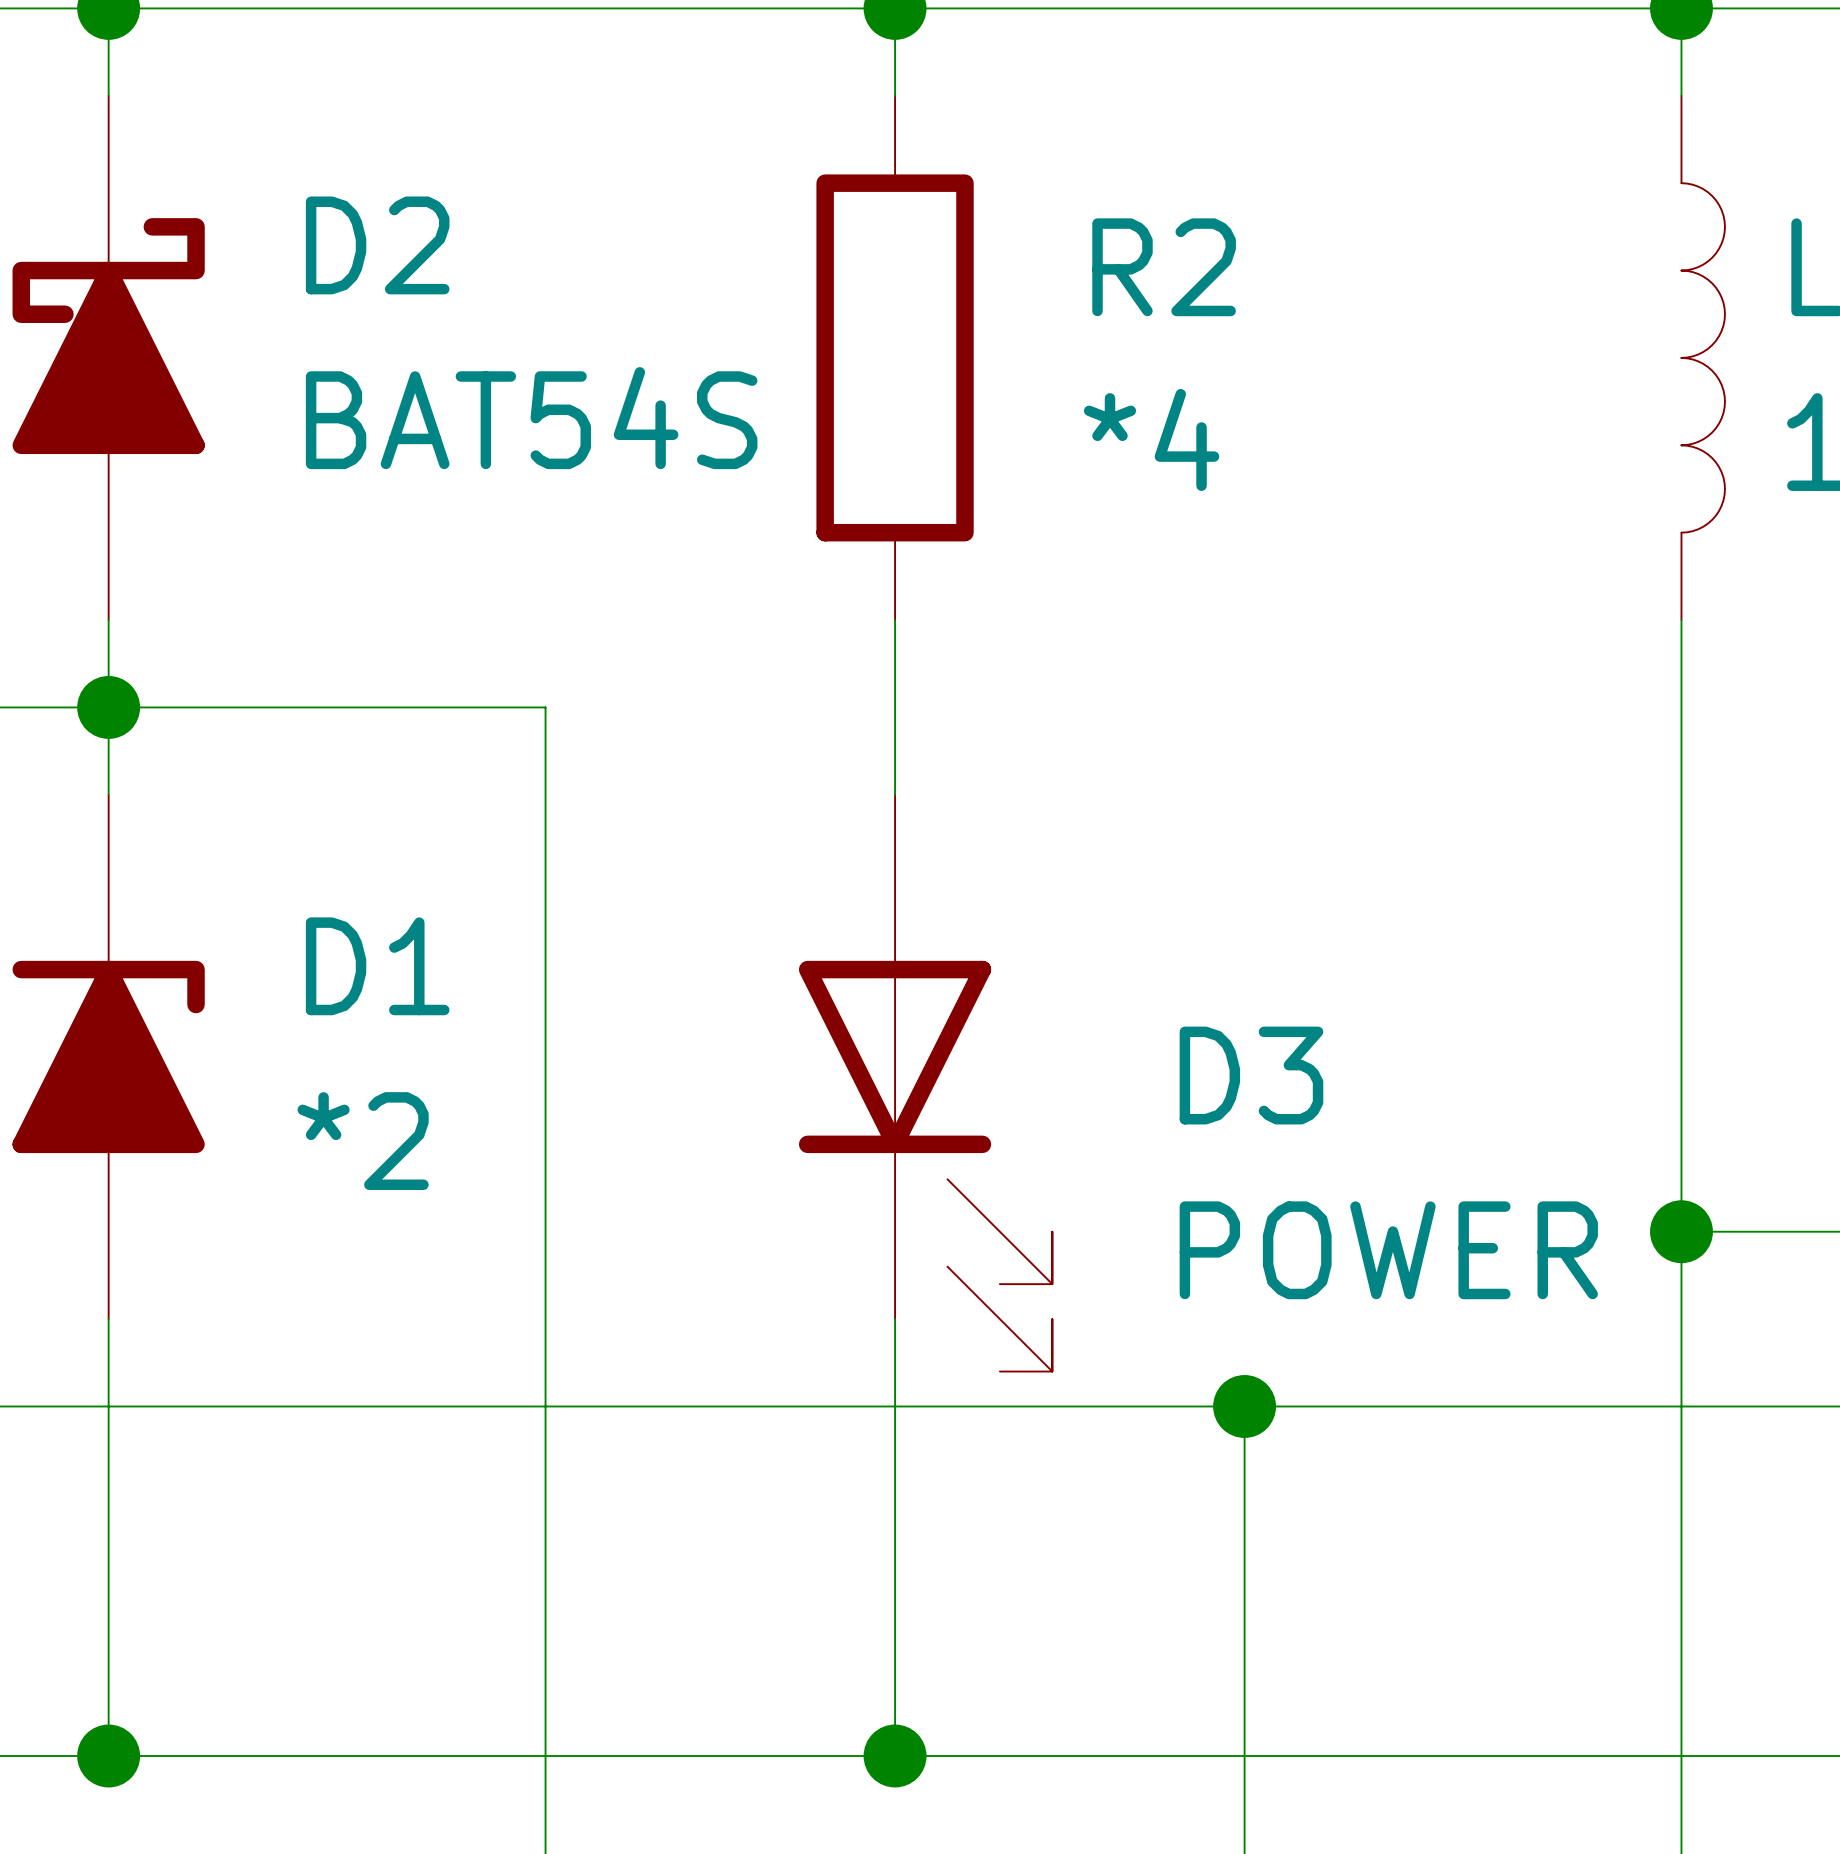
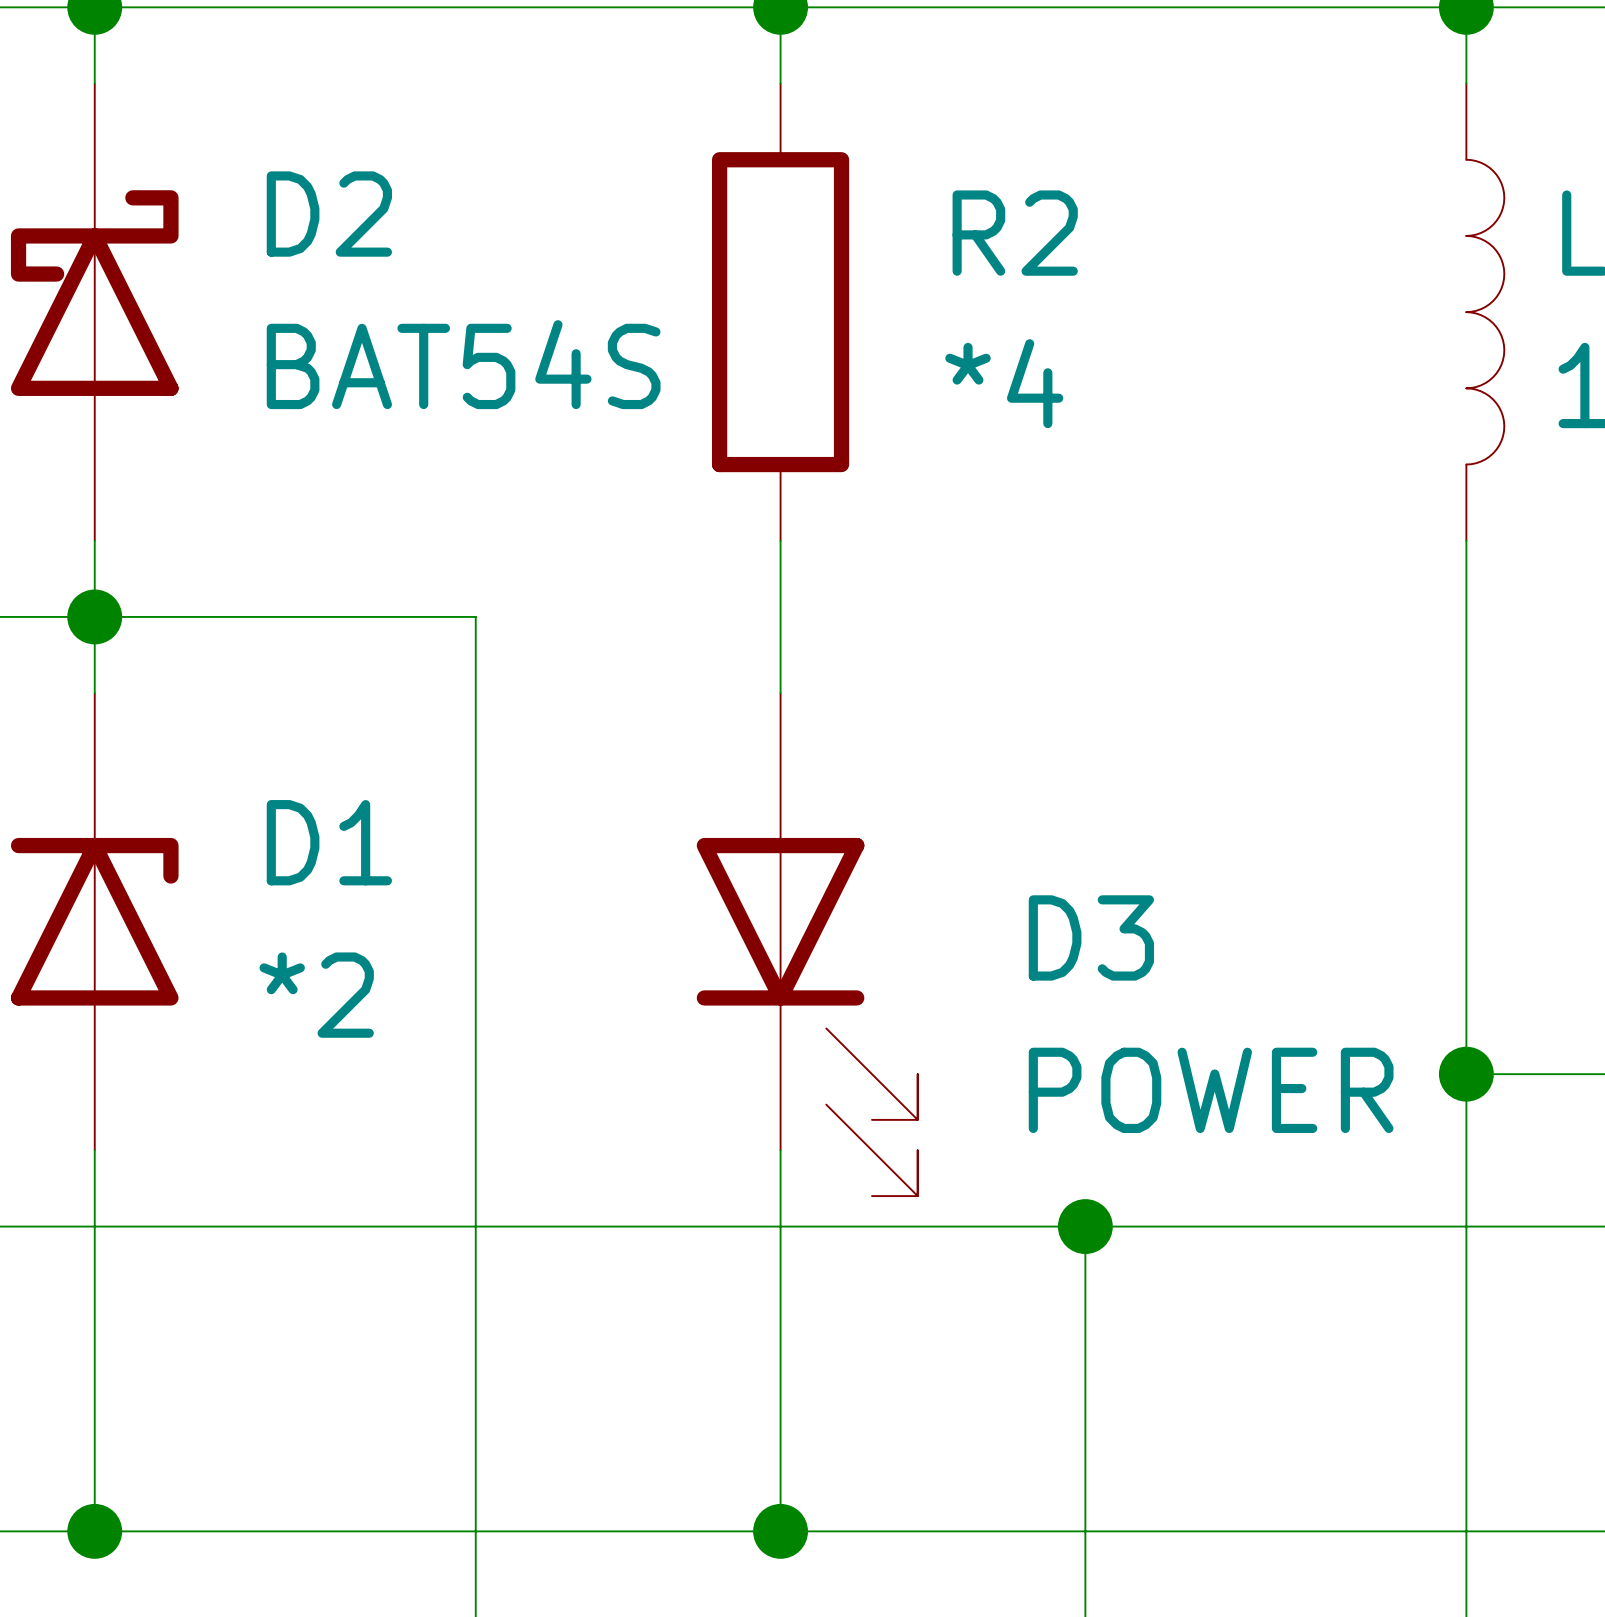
D2 symbol: [12, 95, 205, 621] -> [10, 83, 179, 541]
D1 symbol: [12, 794, 205, 1320] -> [10, 693, 179, 1151]

